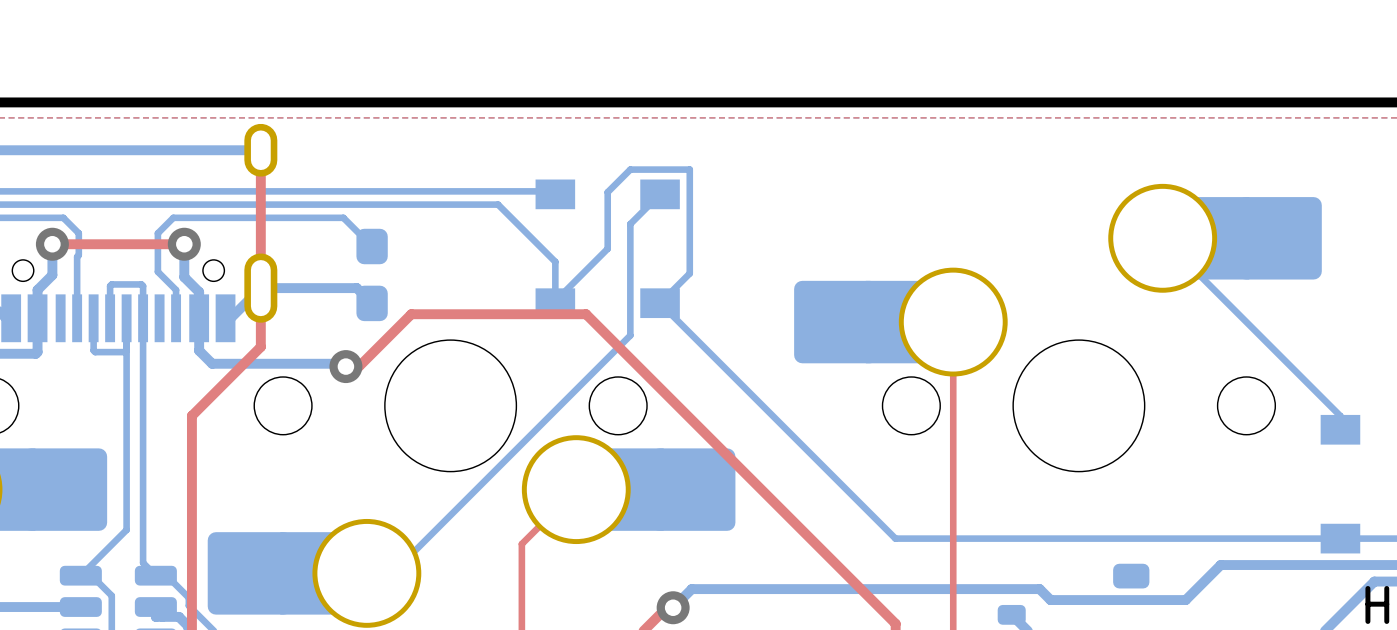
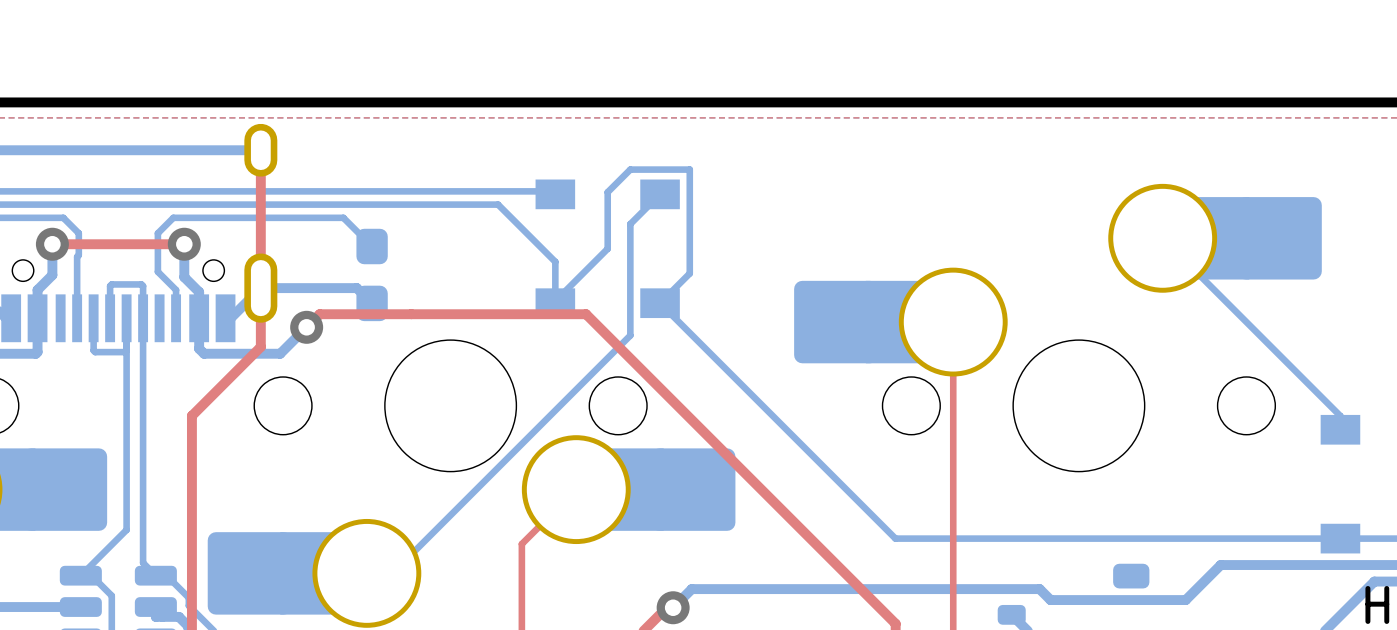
top track: (411, 314) (359, 366) (345, 366) -> (411, 314) (319, 314) (306, 327)
bottom track: (199, 348) (212, 363) (343, 363) (345, 366) -> (199, 348) (204, 353) (280, 353) (306, 327)
via position: (345, 366) -> (306, 327)

